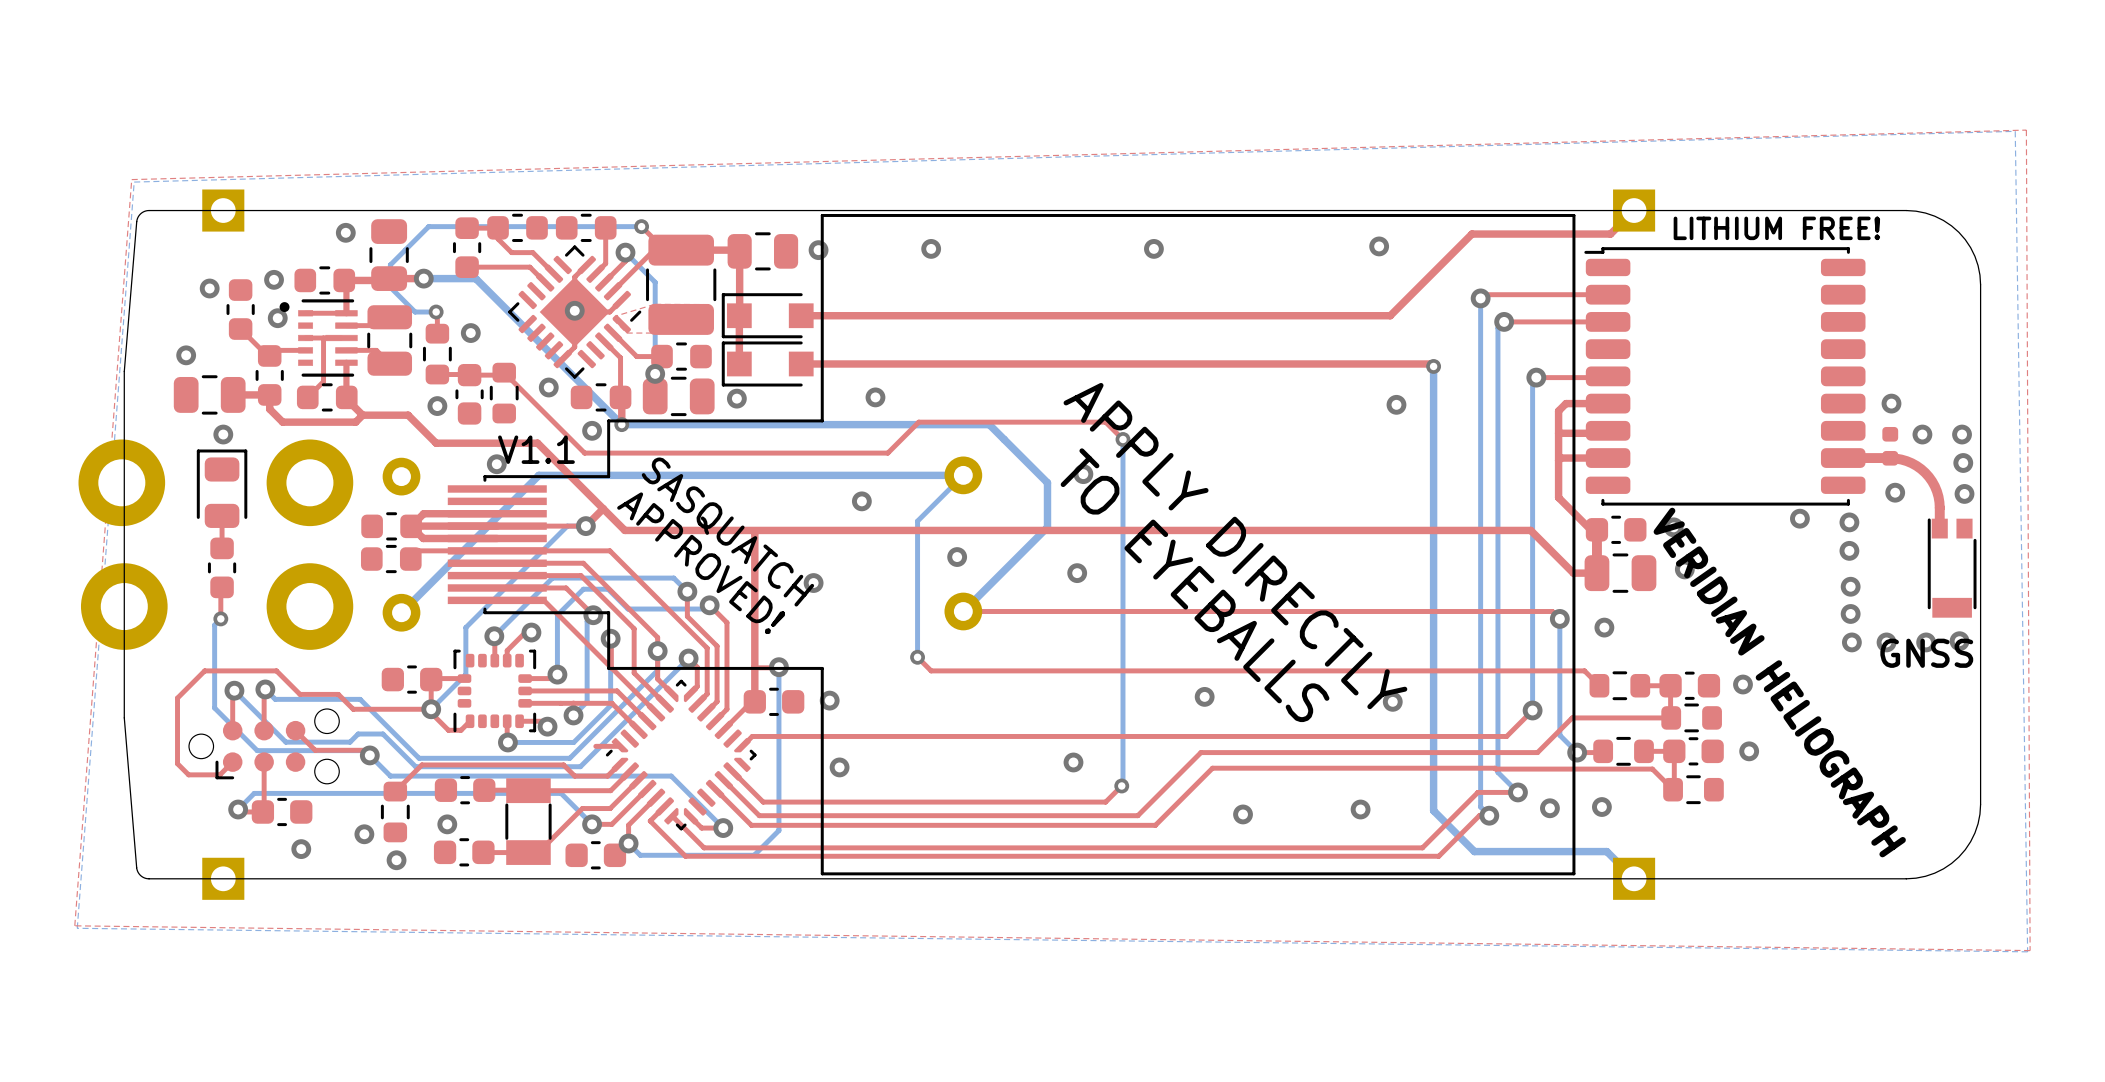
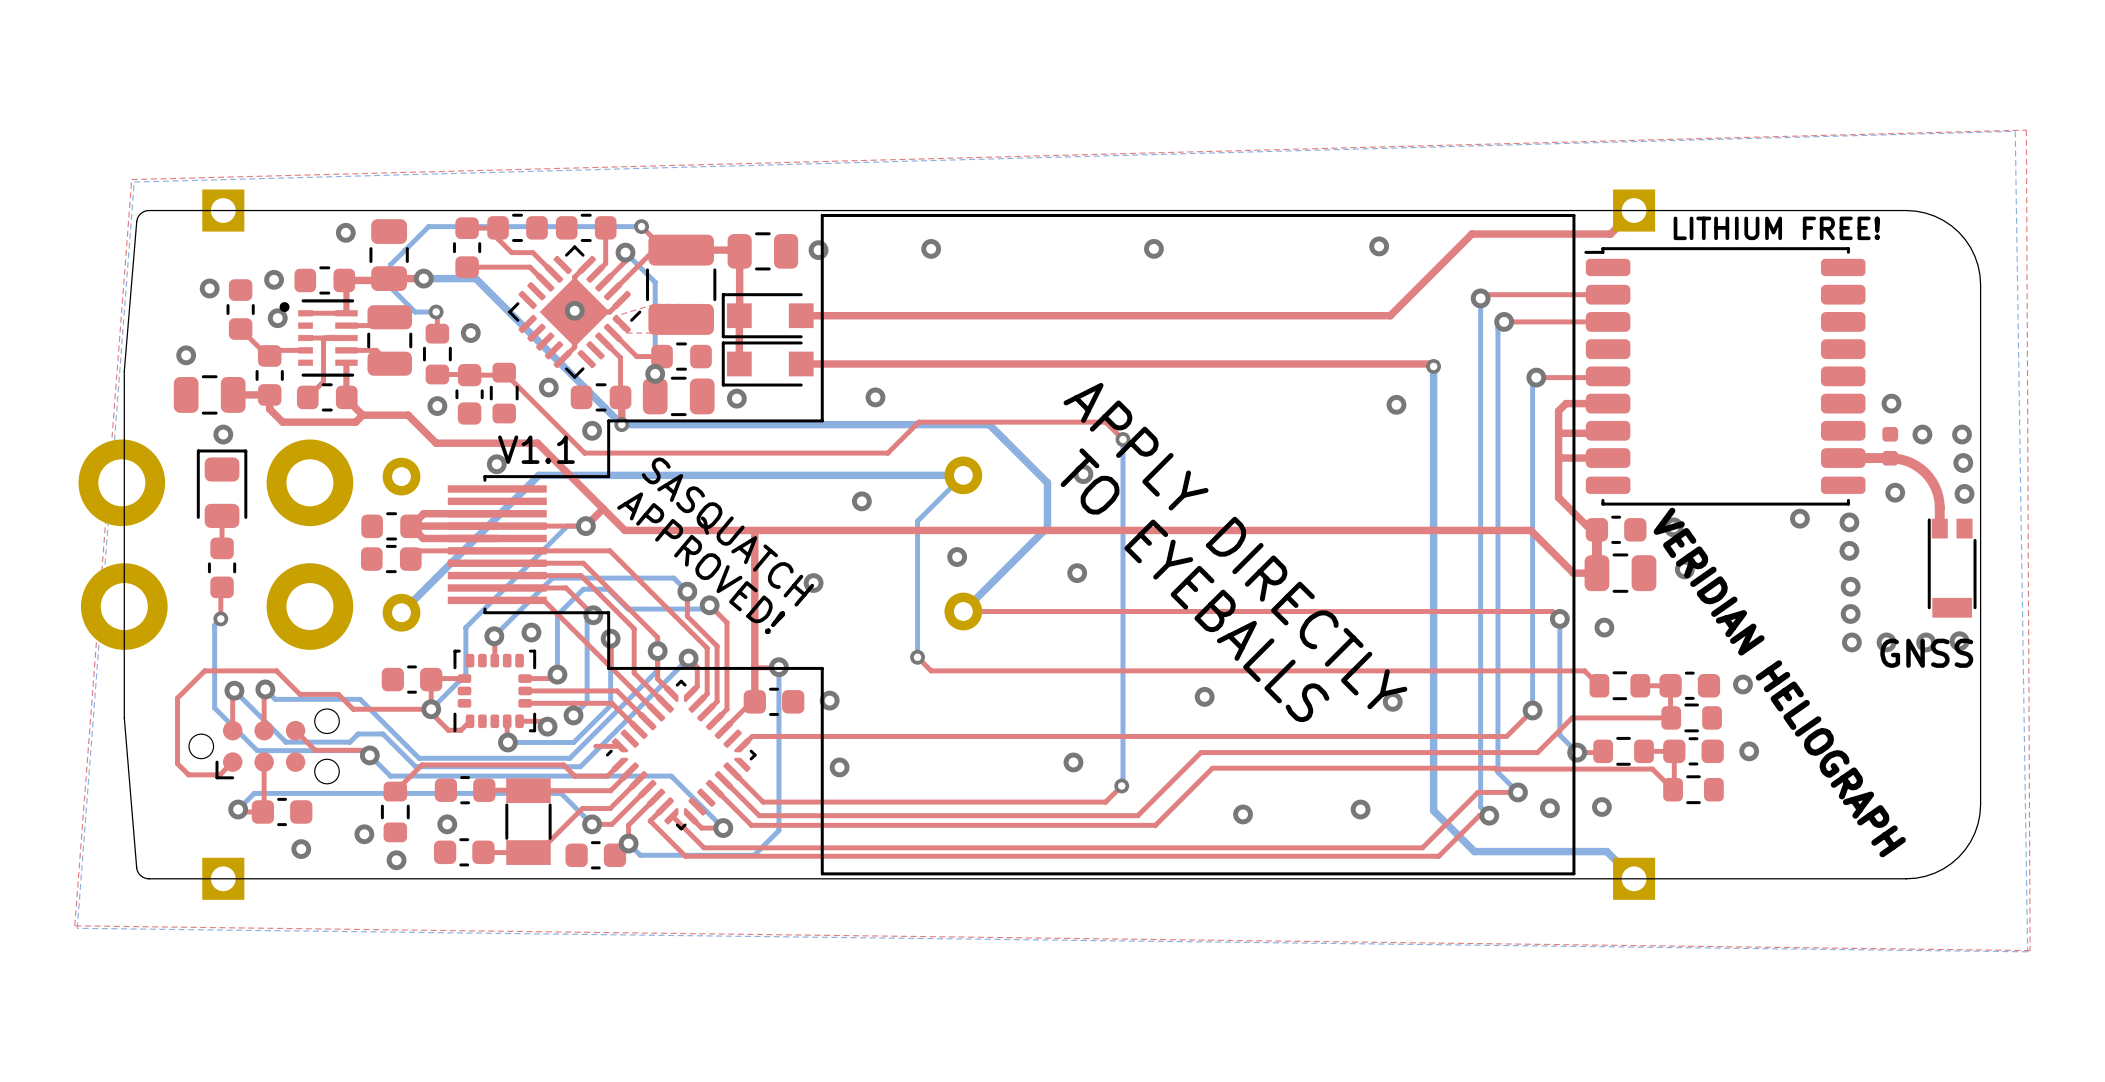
top track: (525, 632) (507, 650) (507, 660) -> none

